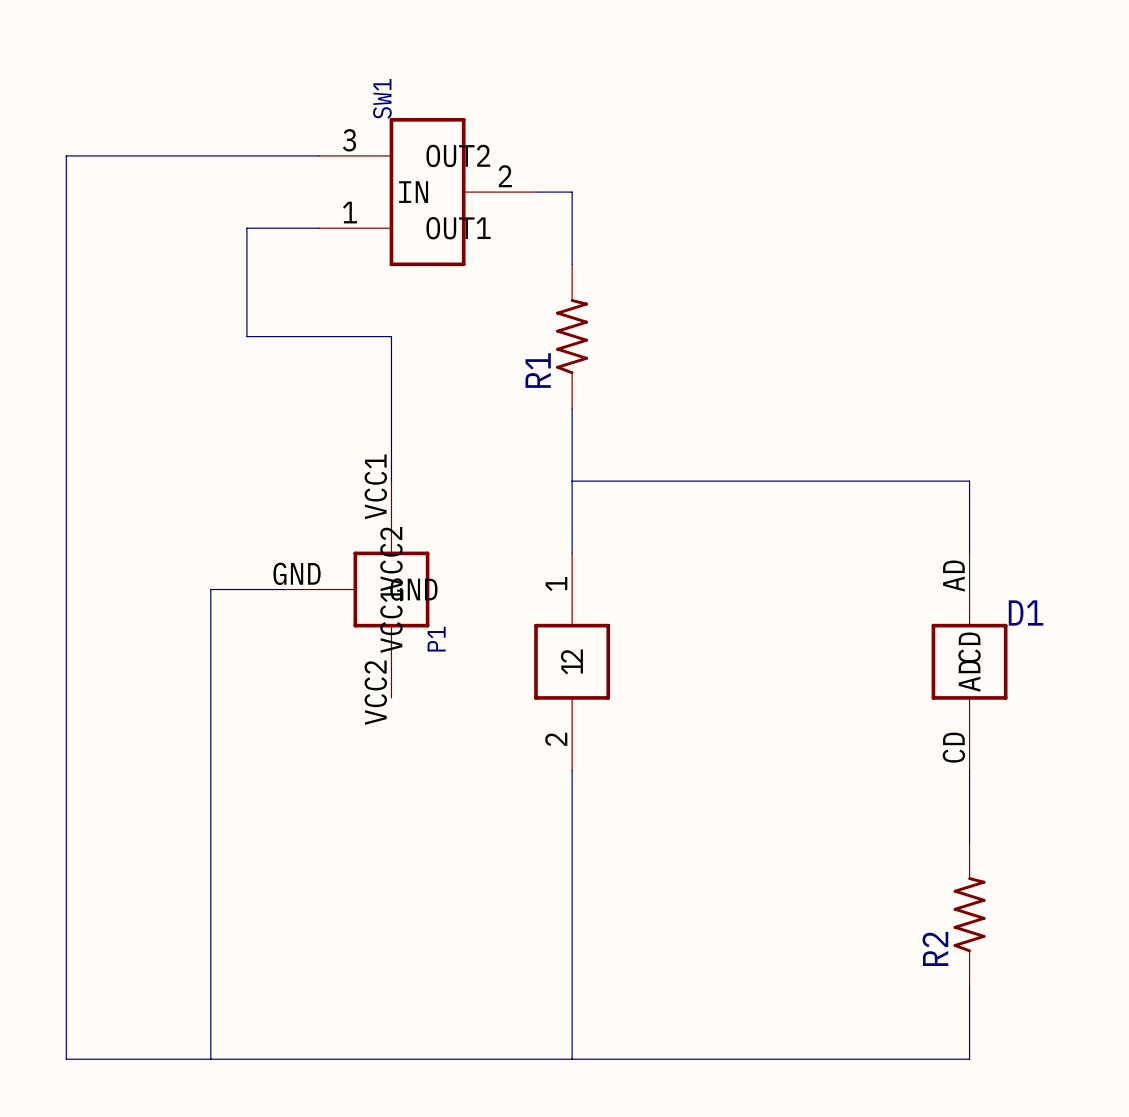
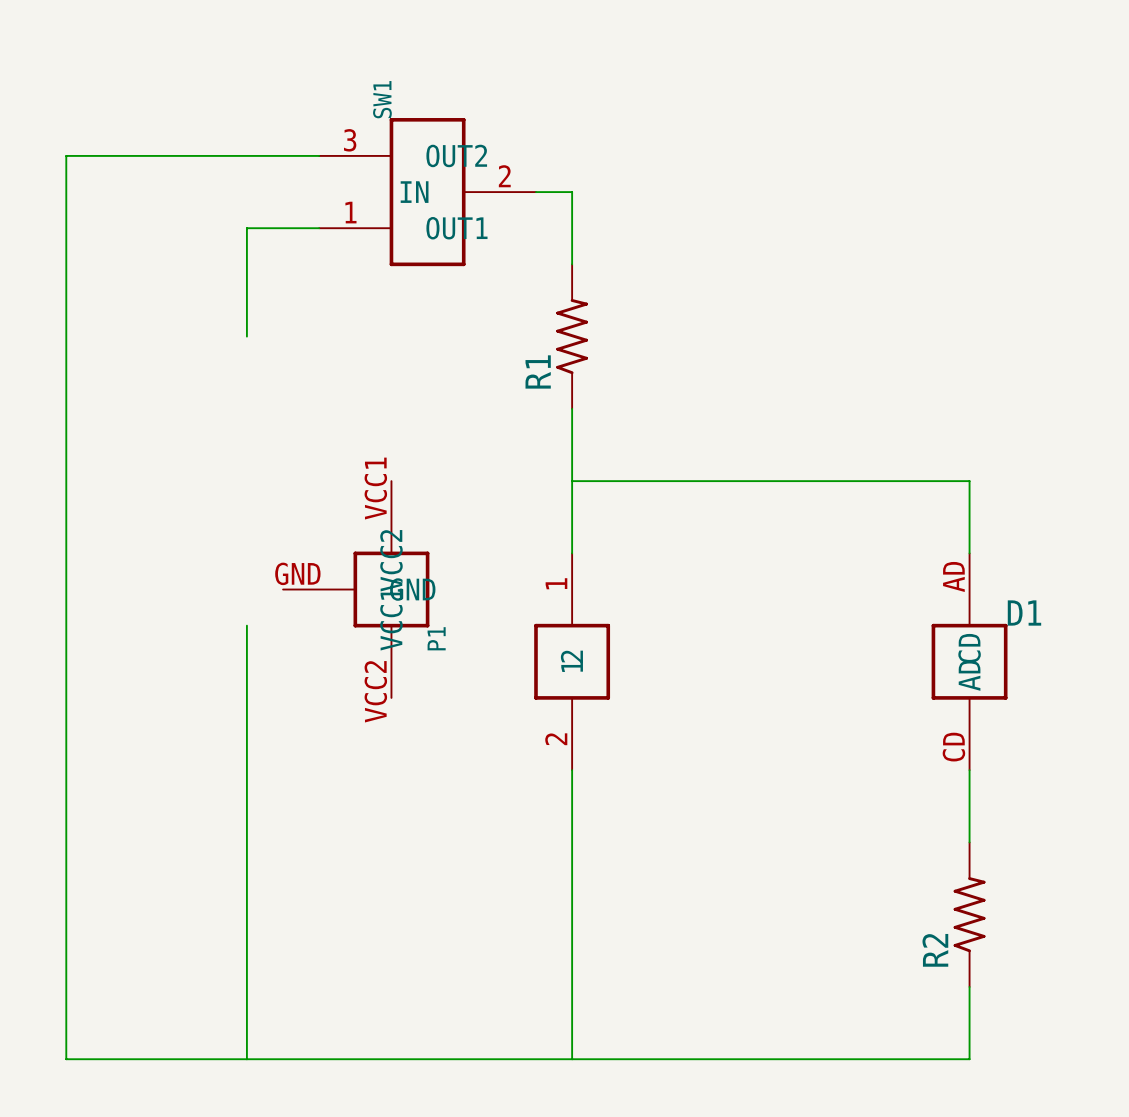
wire: (246, 336) (391, 336) (391, 481) -> none
wire: (283, 589) (210, 589) (210, 1059) -> none
wire: none -> (246, 625) (246, 1059)

